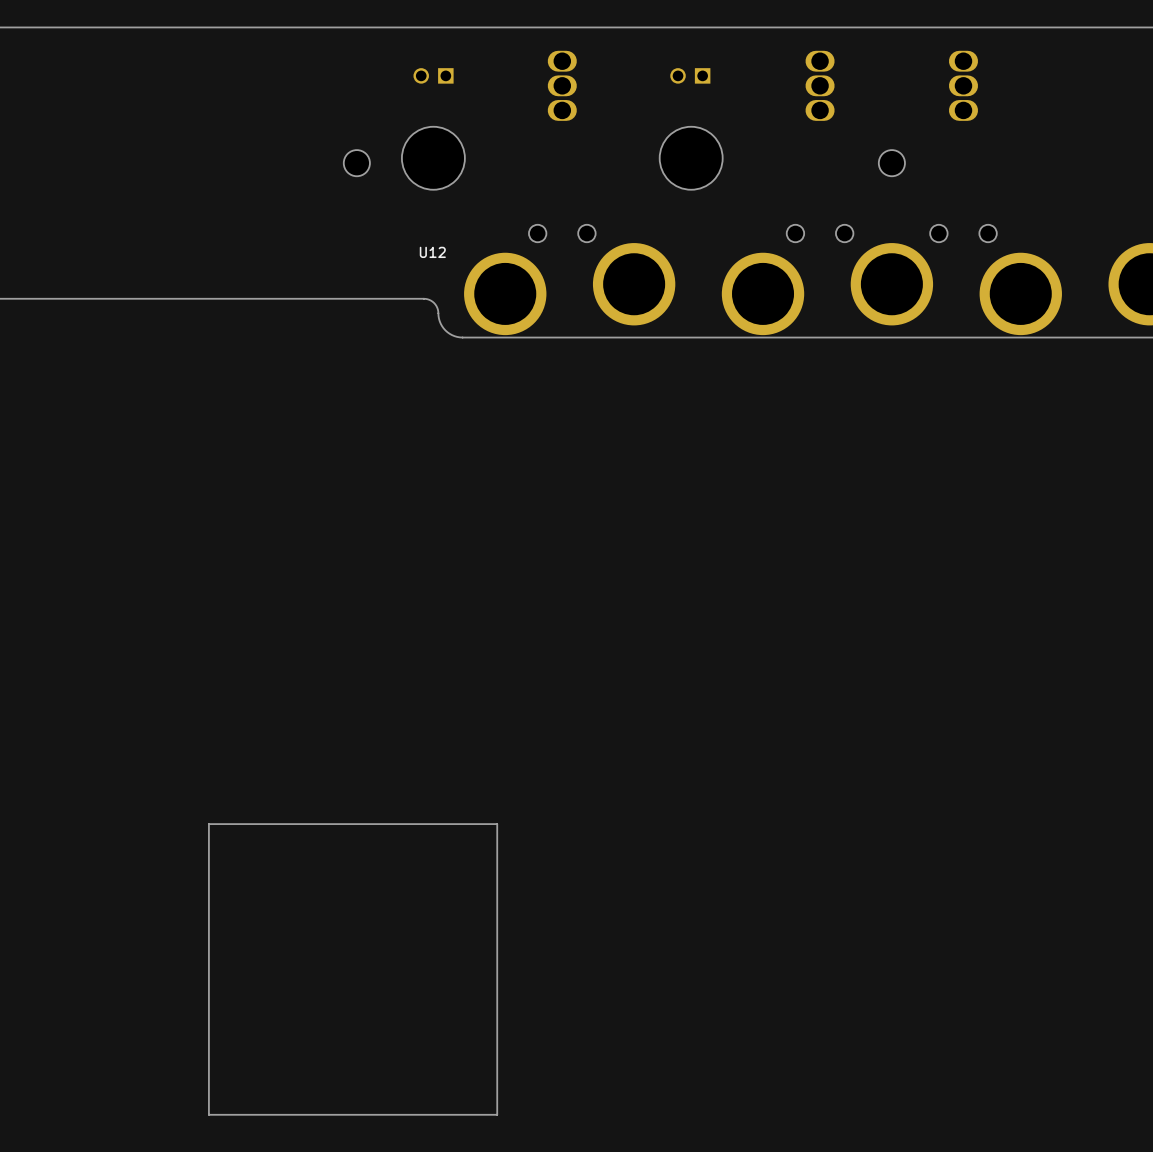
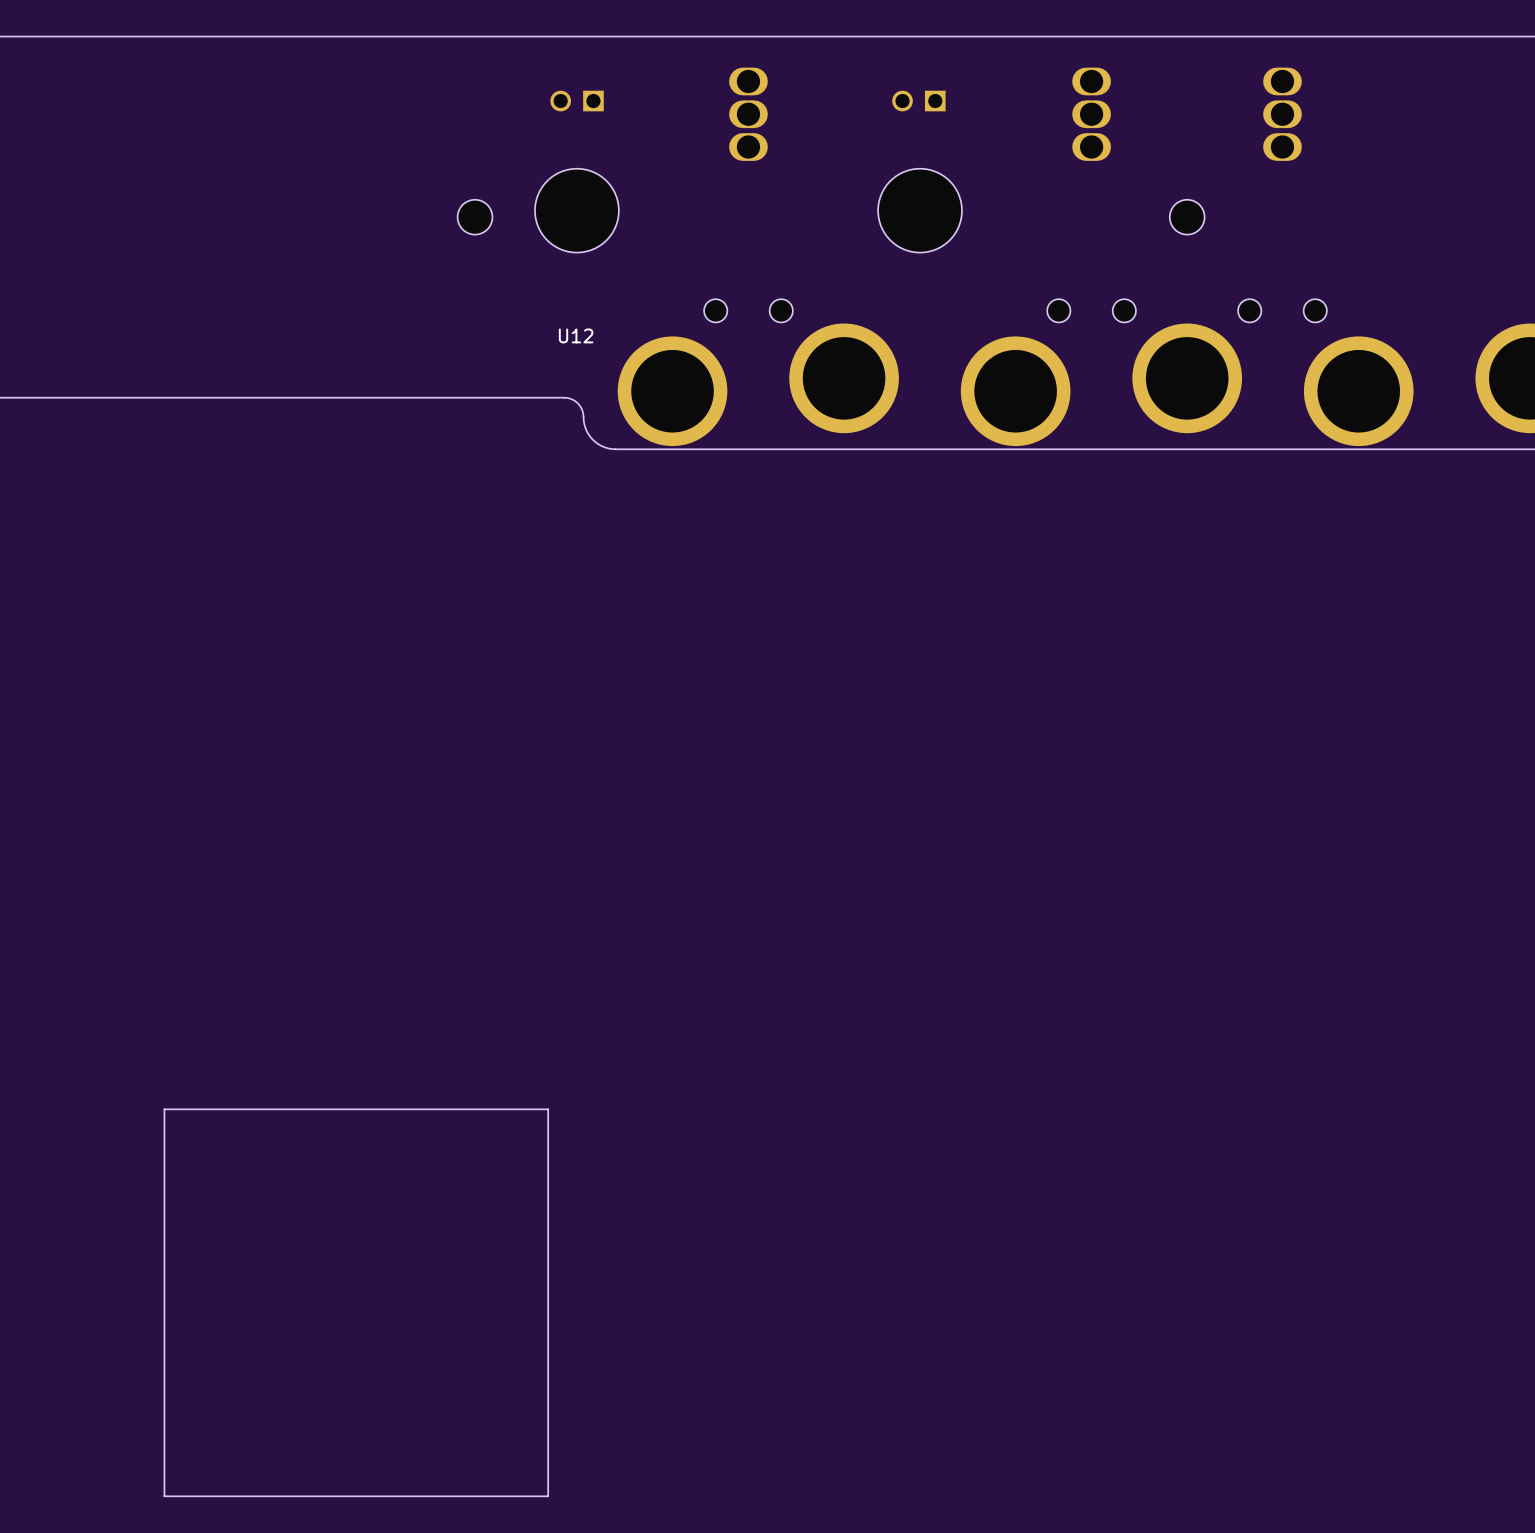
board edge: (497, 824) (208, 824) (208, 1114) (497, 1114) (497, 824) -> (548, 1109) (548, 1496) (164, 1496) (164, 1109) (548, 1109)

